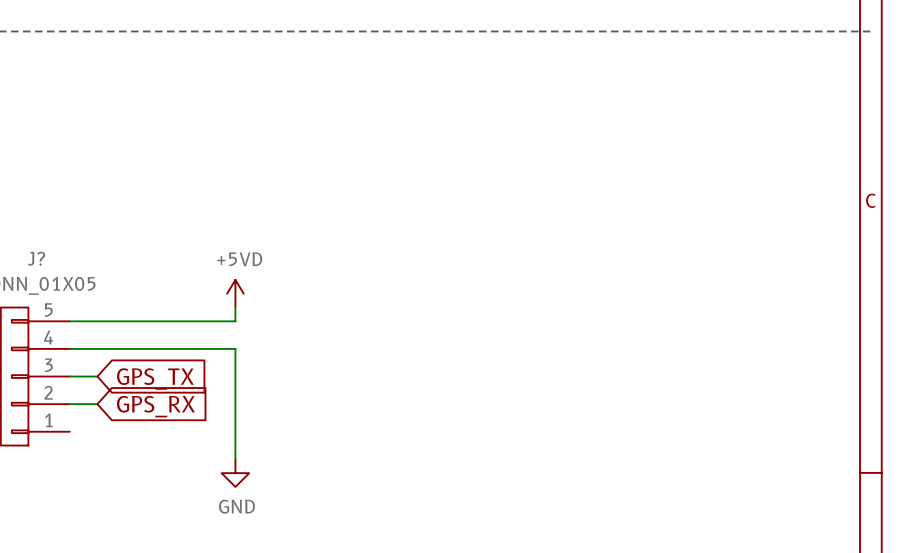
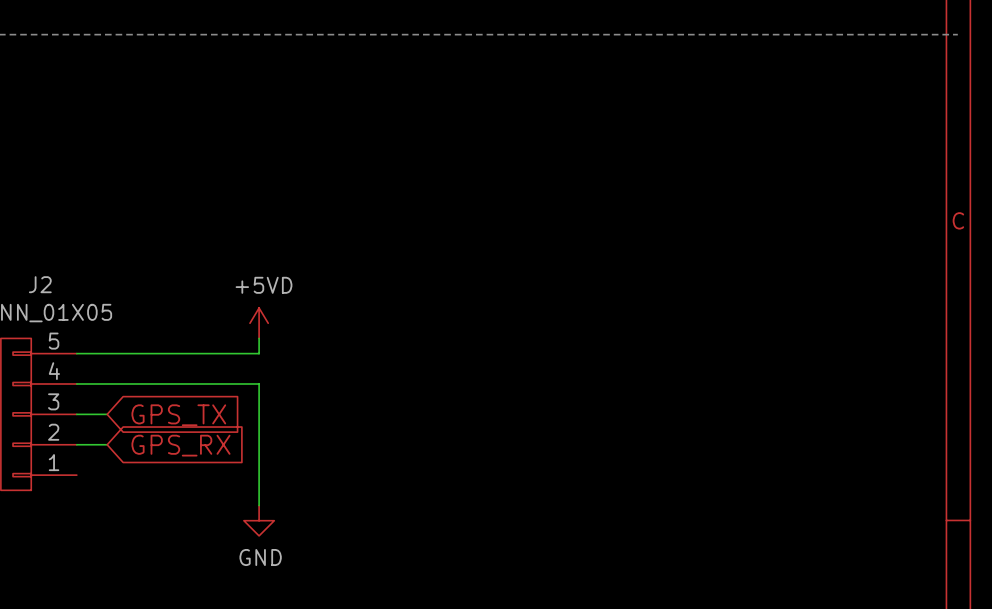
J? name: J? (36, 258) -> J2 (40, 284)

